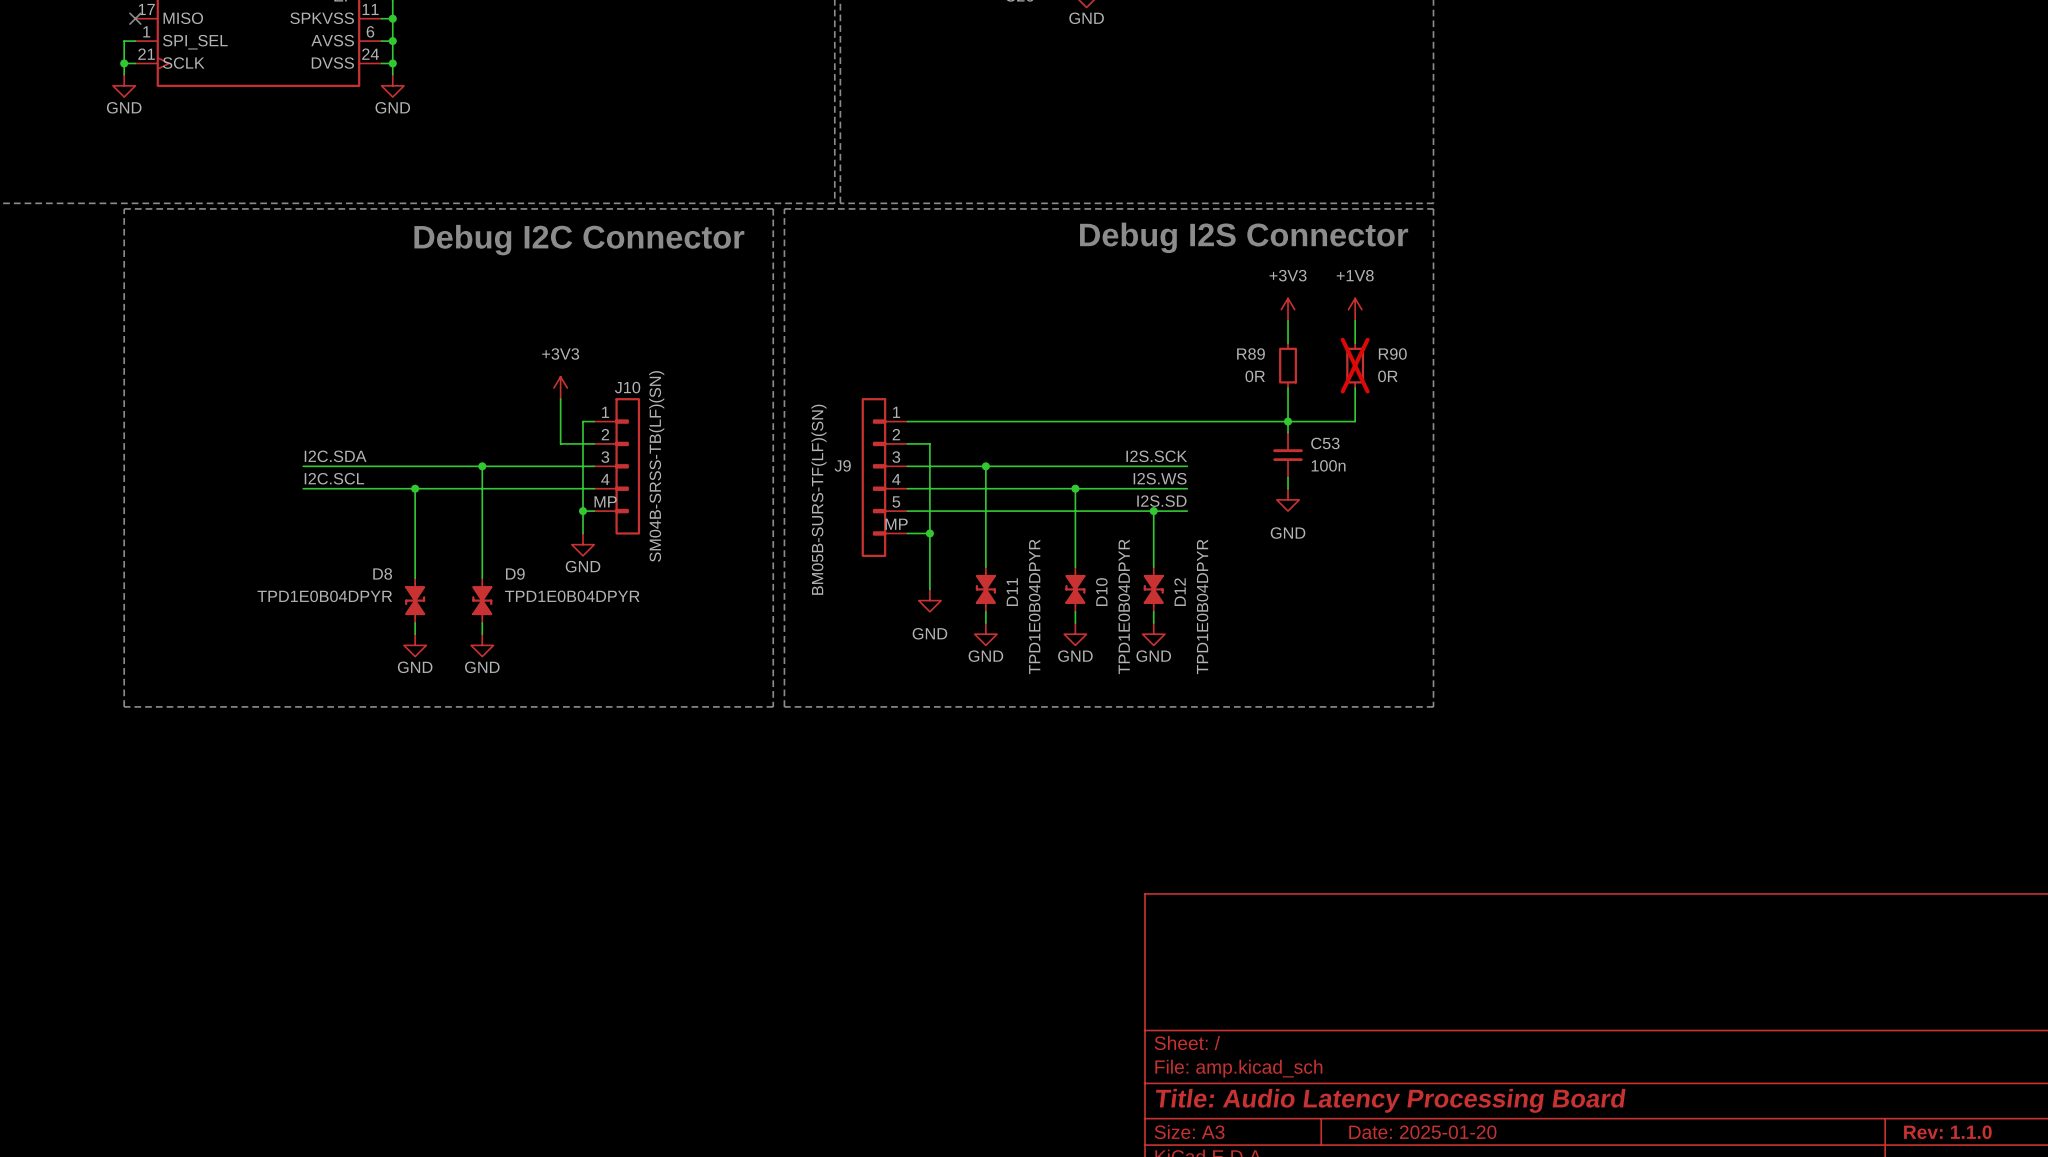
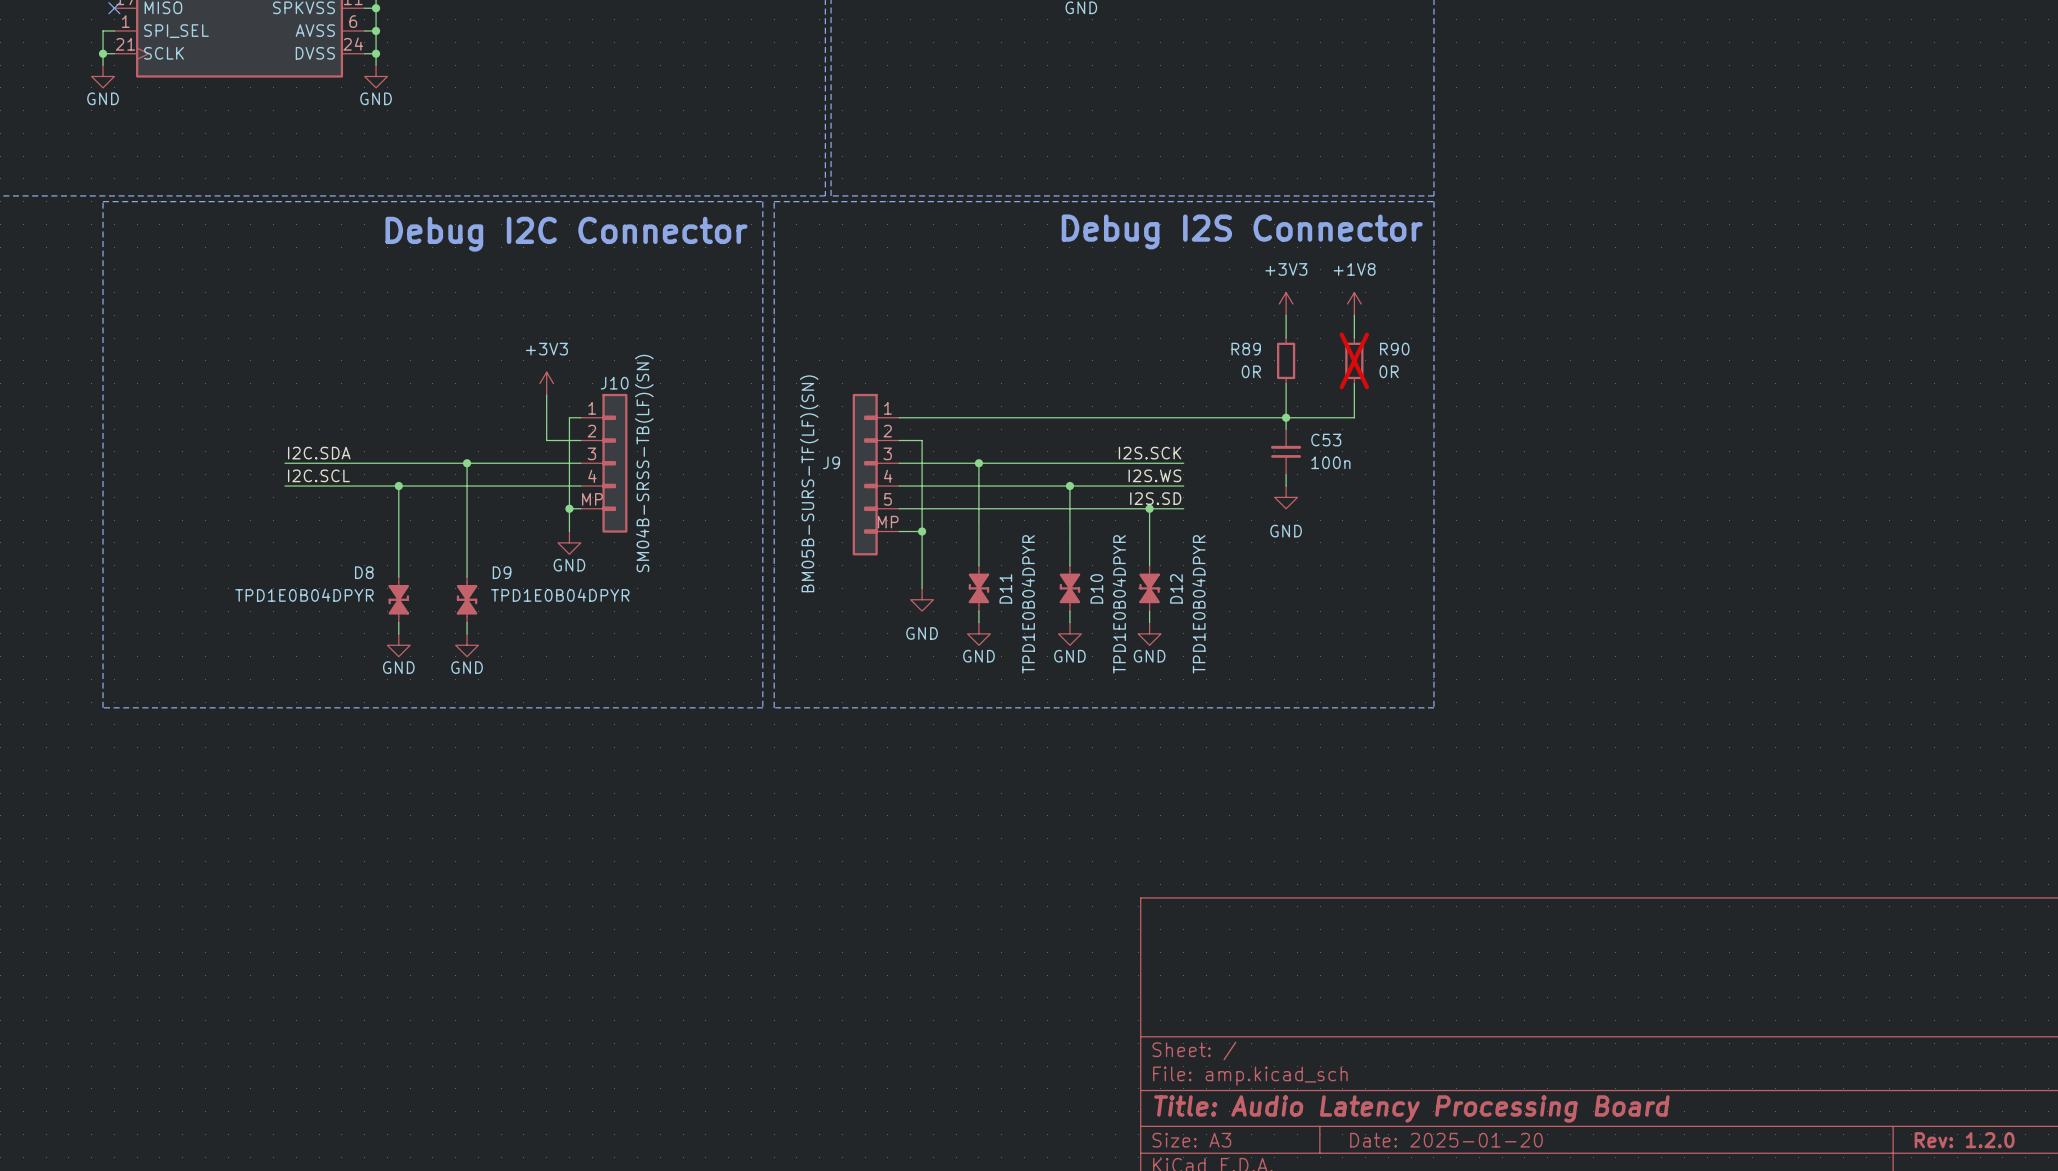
title block: Rev: 1.1.0 (1947, 1132) -> Rev: 1.2.0 (1964, 1140)

